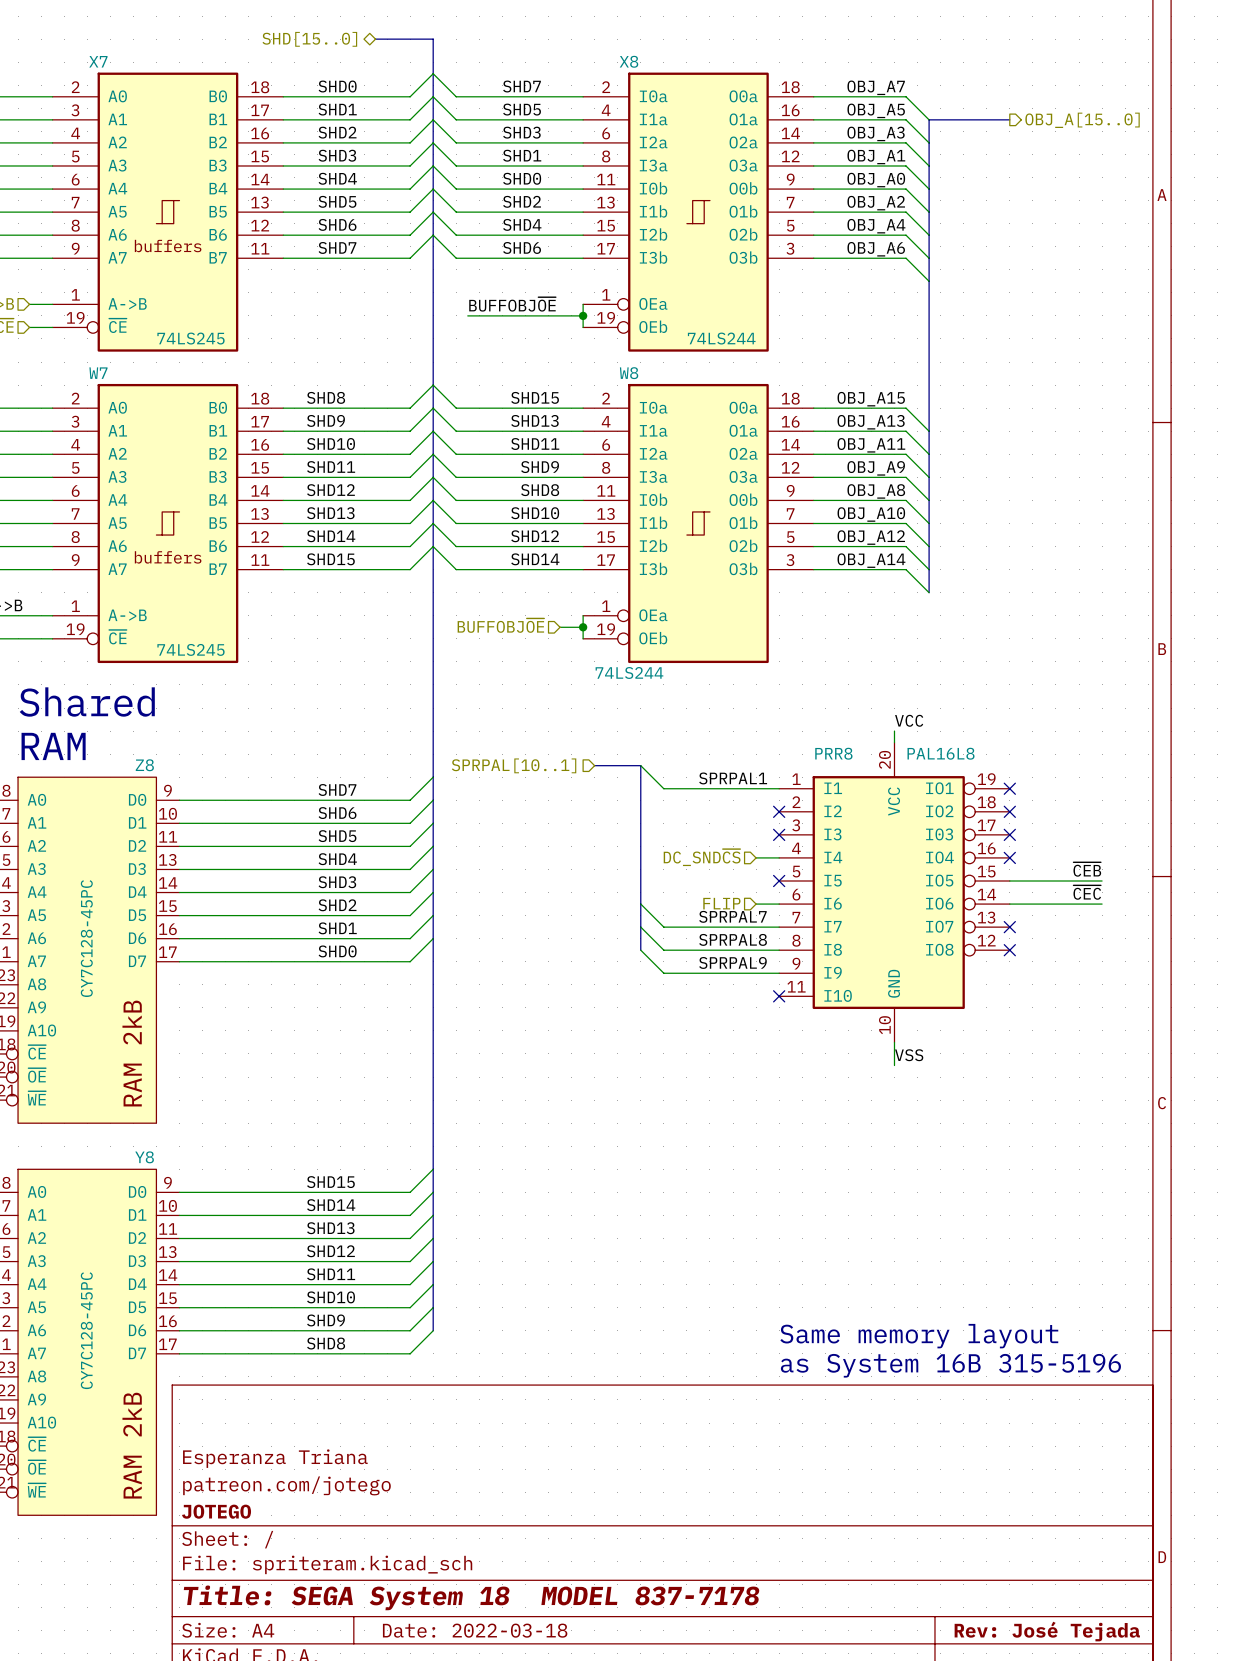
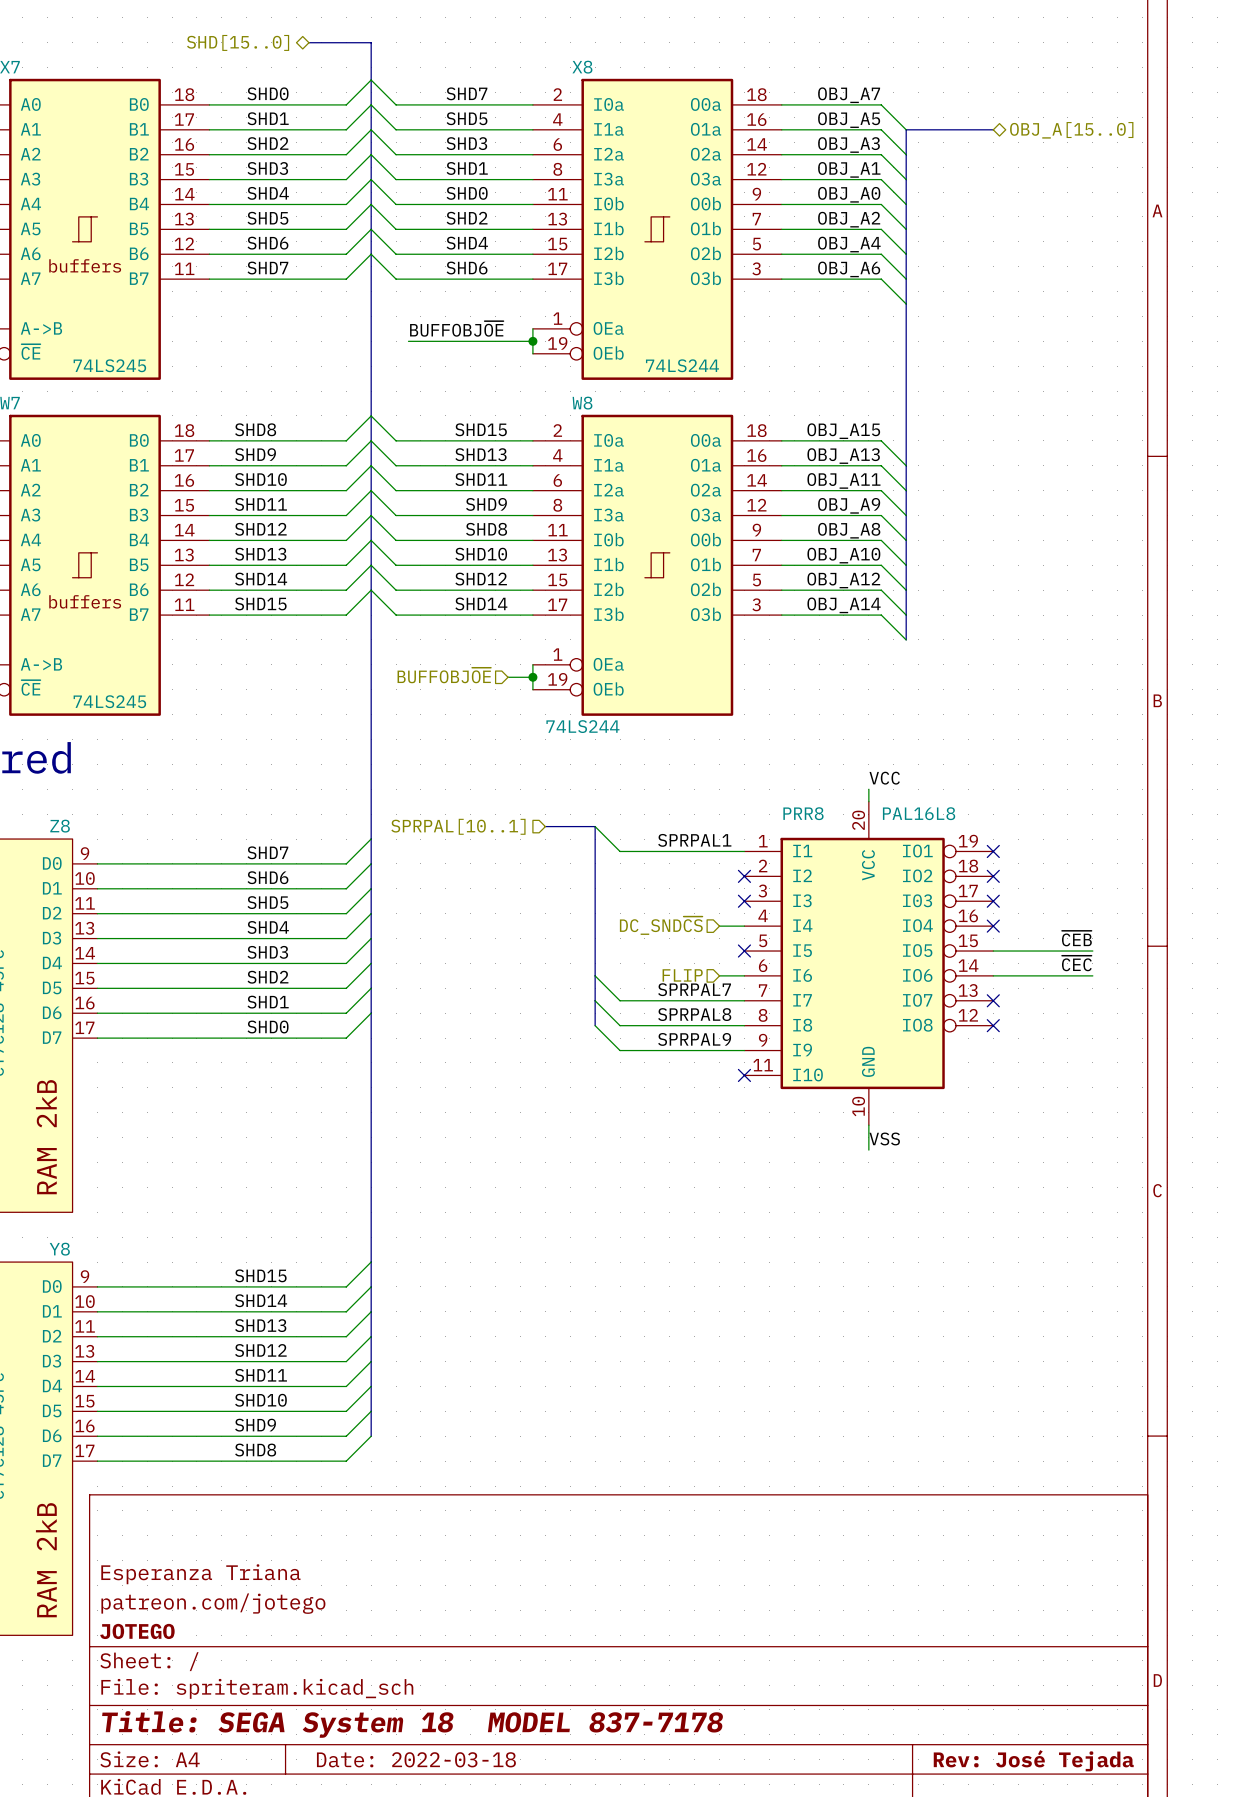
hierarchical label shape: output (1082, 120) -> bidirectional (1071, 130)
text: Same memory layout (919, 1336) -> none
text: as System 16B 315-5196 (950, 1365) -> none

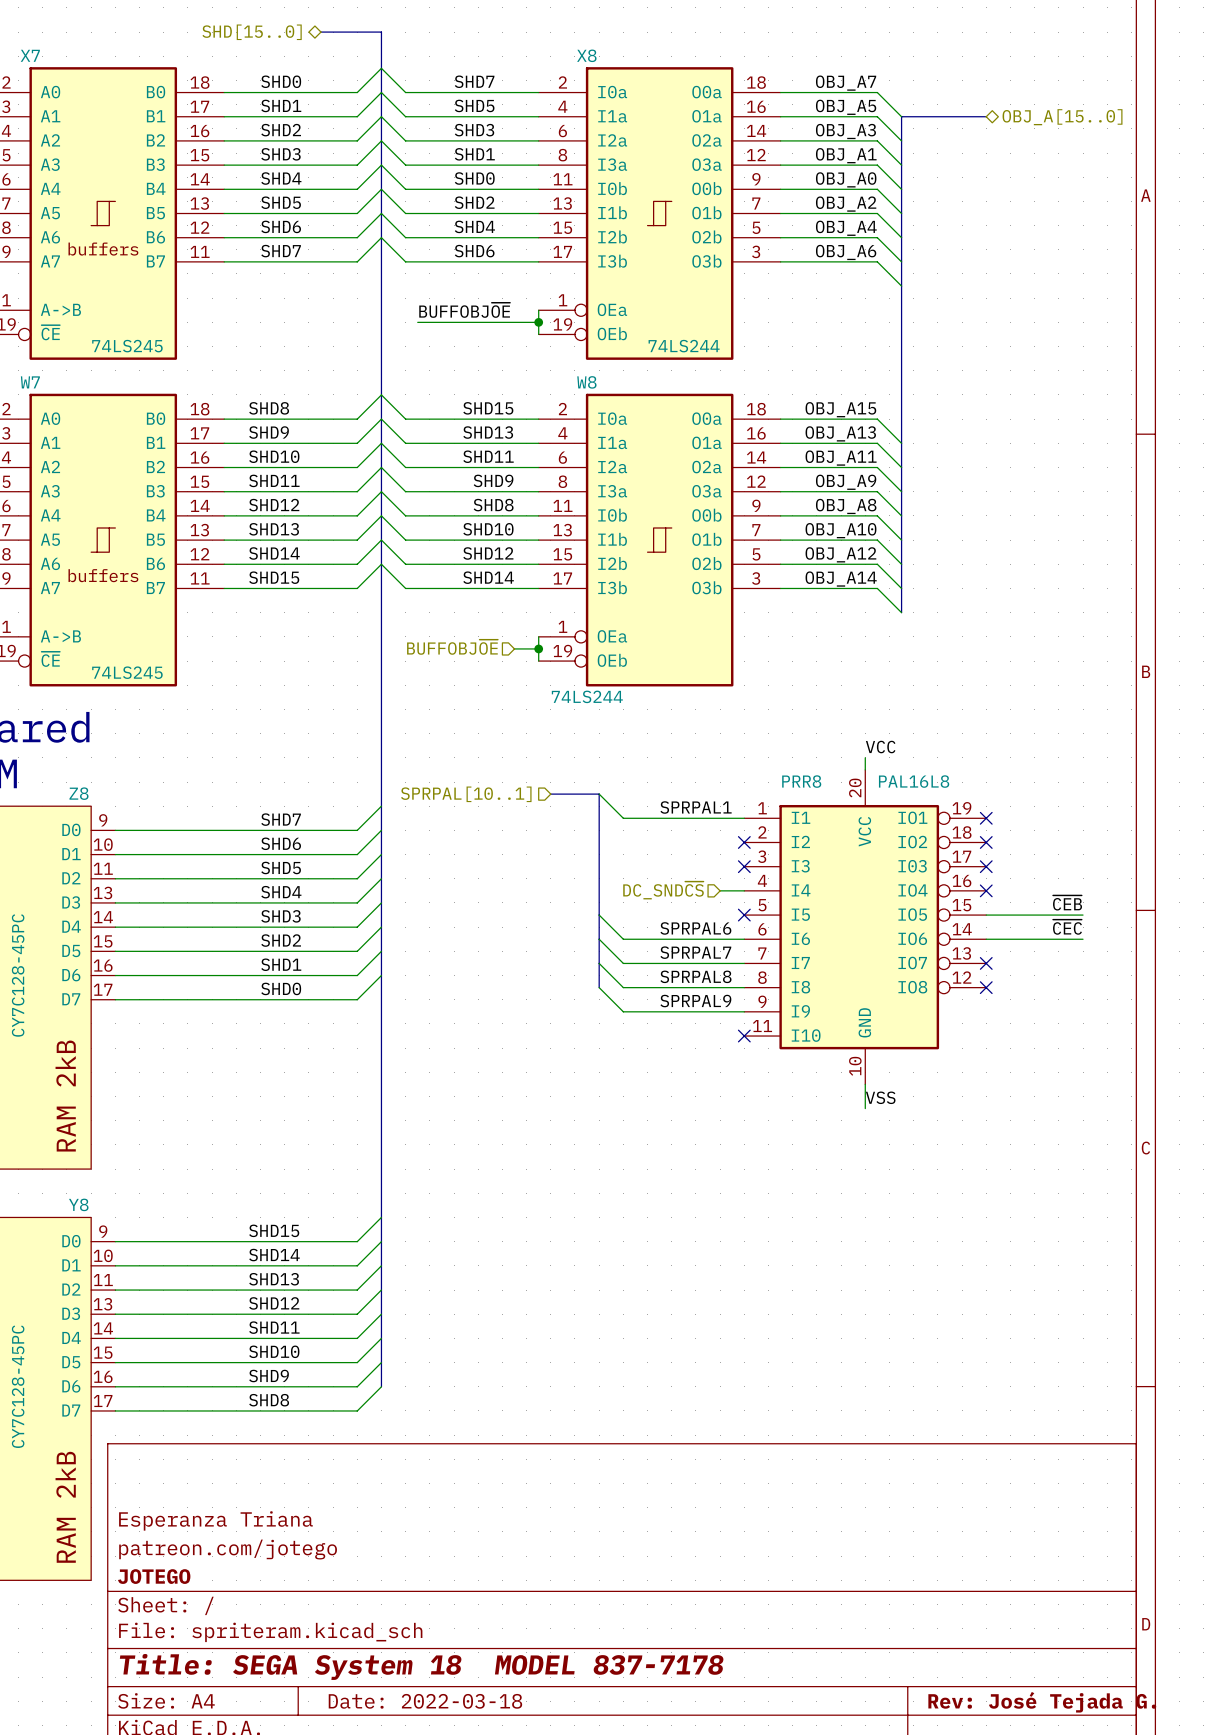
wire: none -> (599, 915) (623, 939) (720, 939)
label: none -> SPRPAL6 (695, 928)
hierarchical label: FLIP (682, 975) -> none
title block: Rev: José Tejada (1033, 1760) -> Rev: José Tejada G. (1042, 1702)

